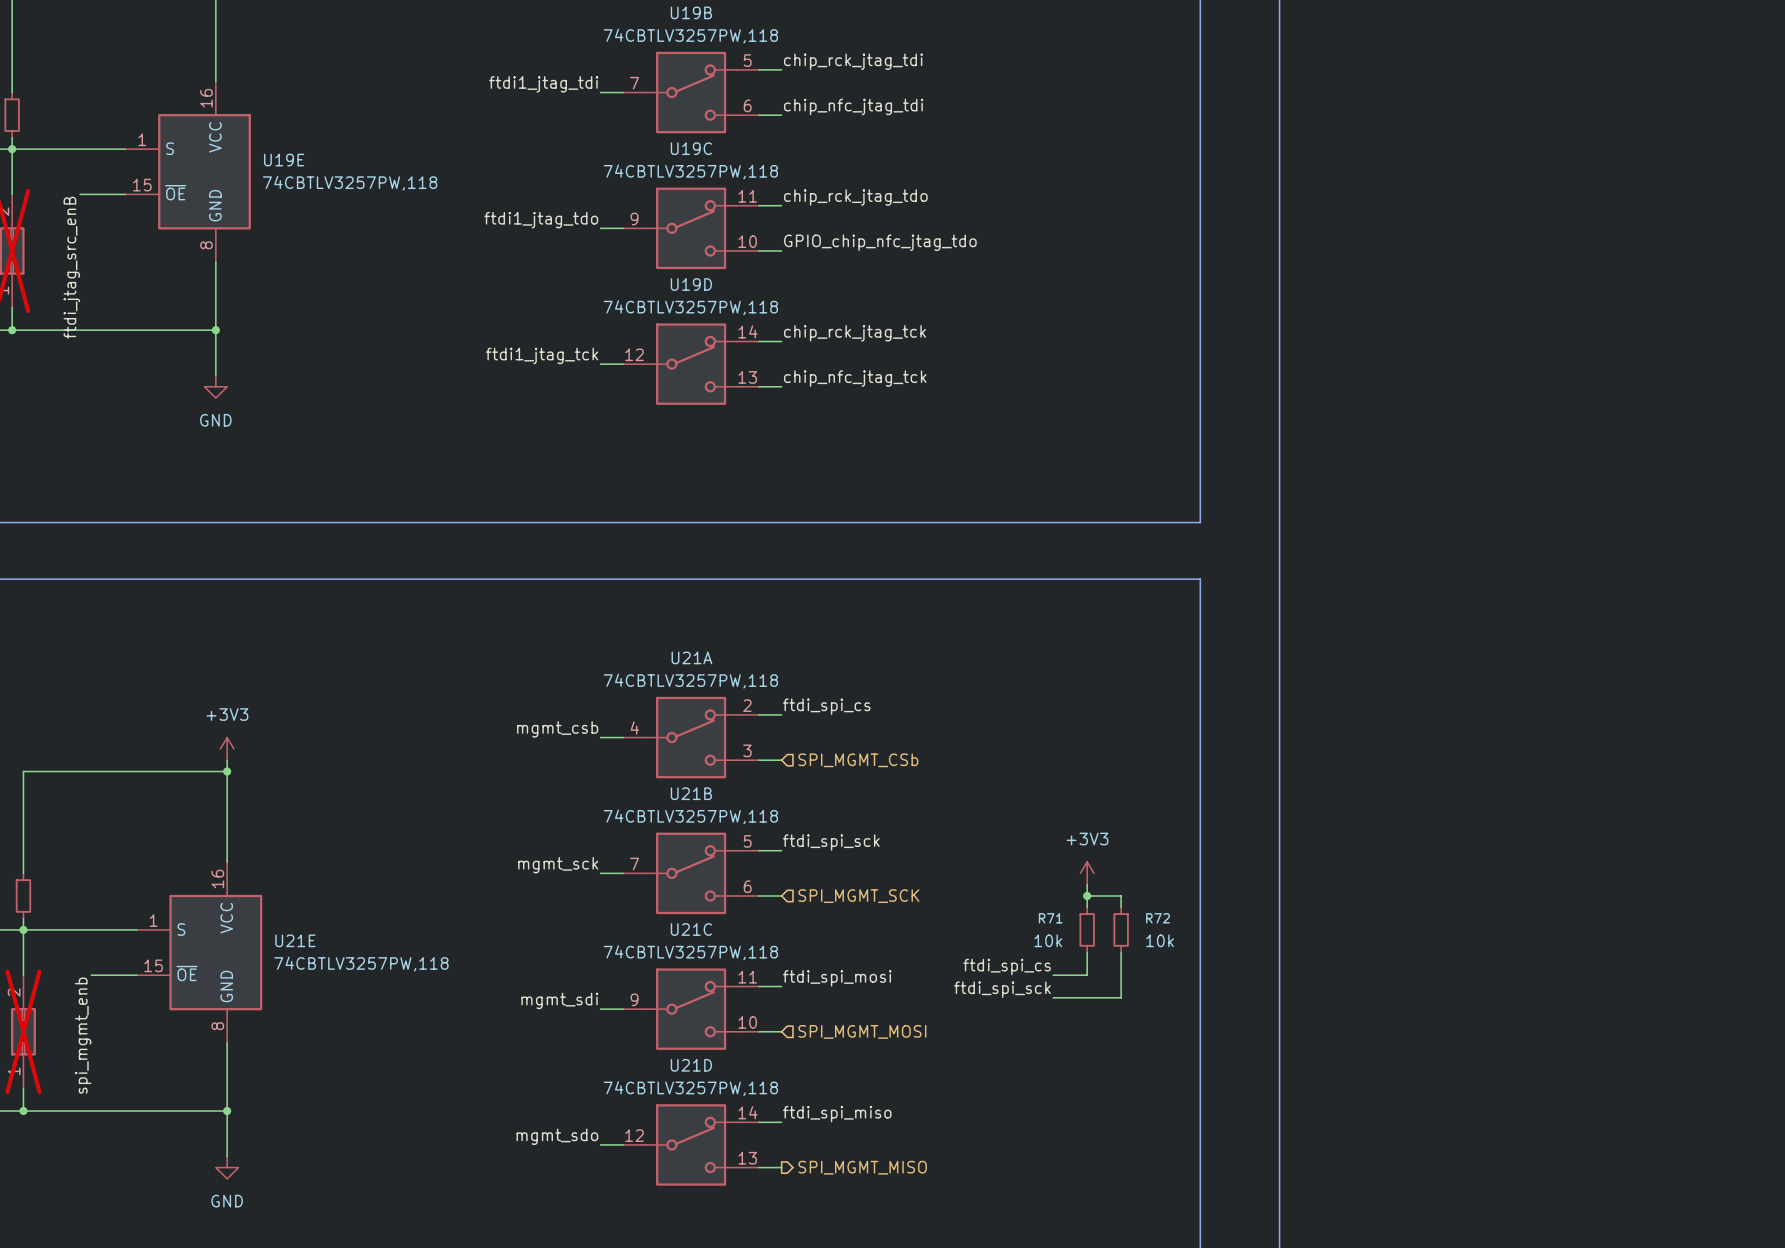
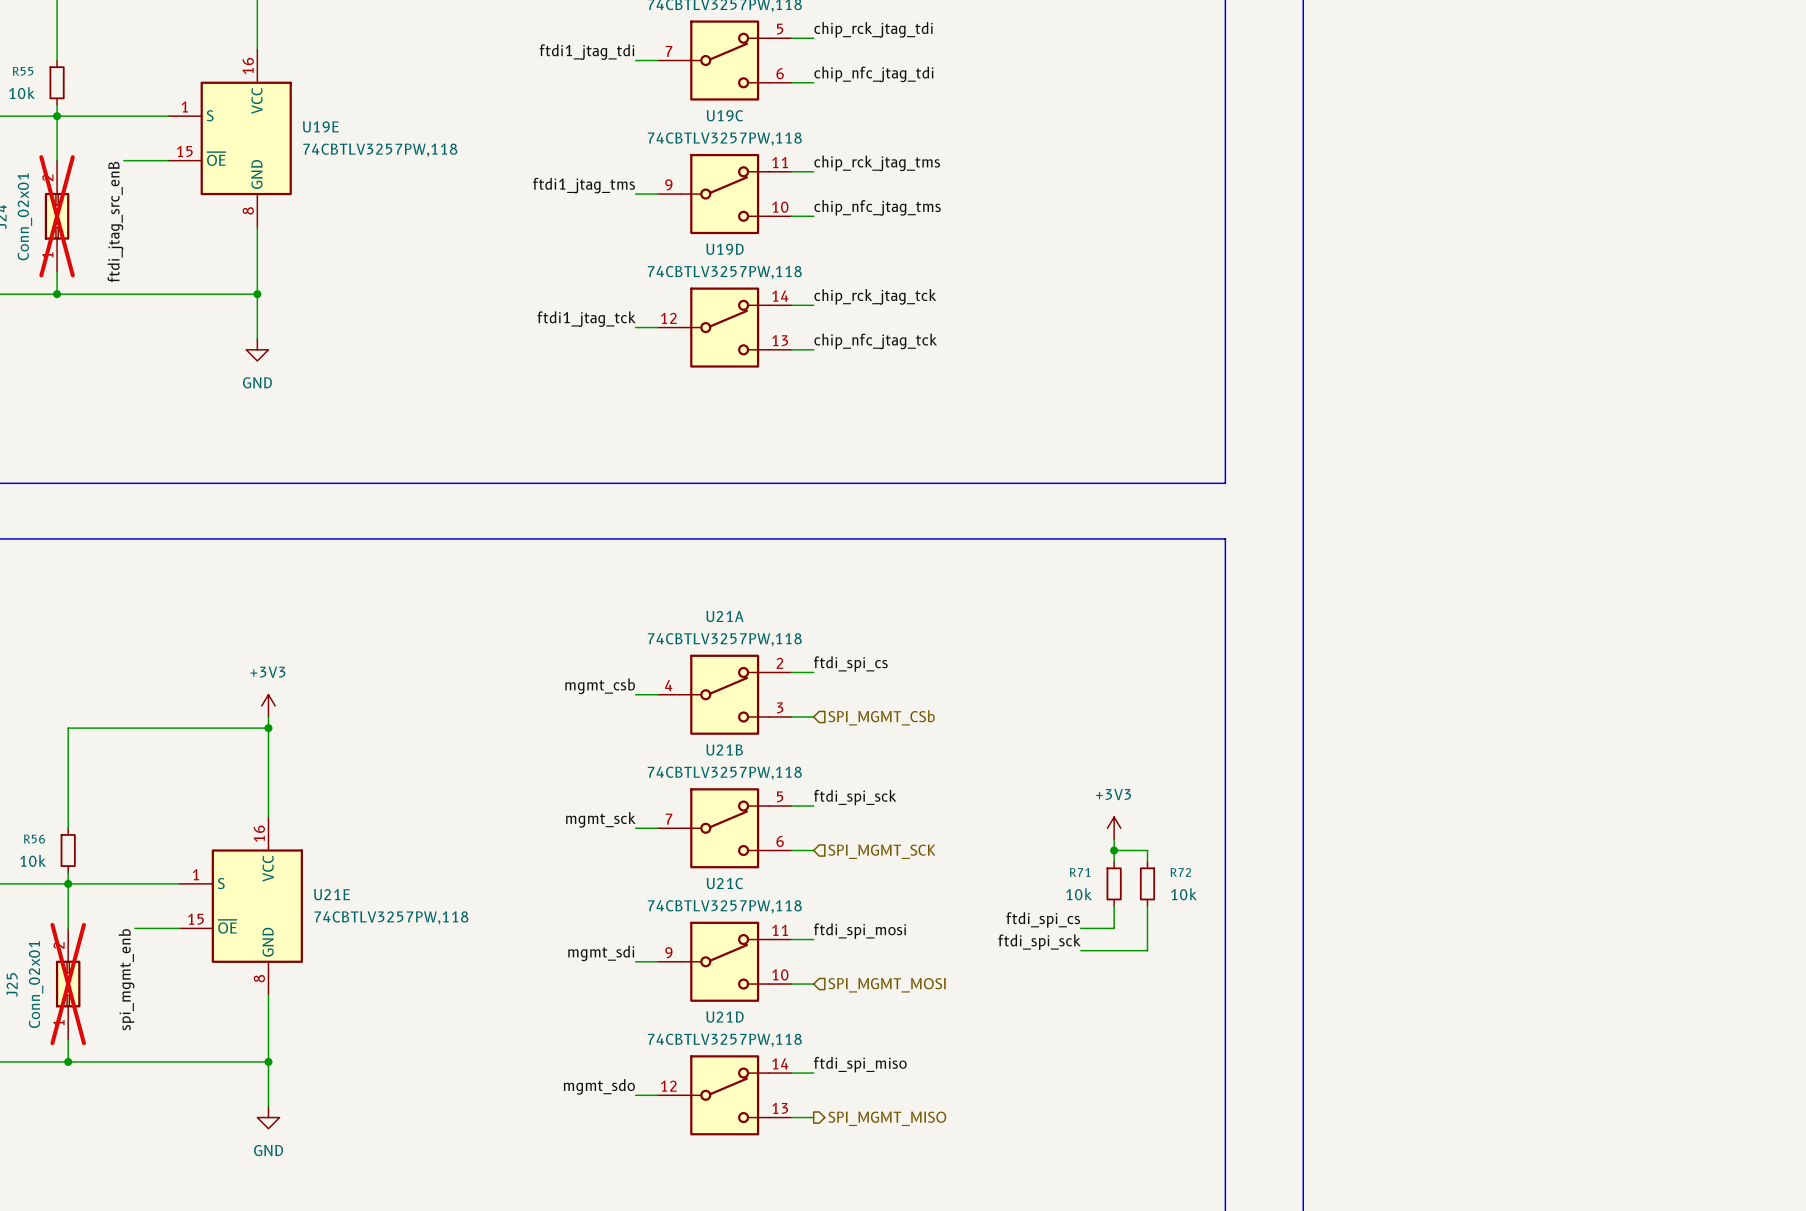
label: chip_rck_jtag_tdo (855, 197) -> chip_rck_jtag_tms (877, 163)
label: ftdi1_jtag_tdo (541, 220) -> ftdi1_jtag_tms (584, 185)
label: GPIO_chip_nfc_jtag_tdo (880, 242) -> chip_nfc_jtag_tms (877, 207)

